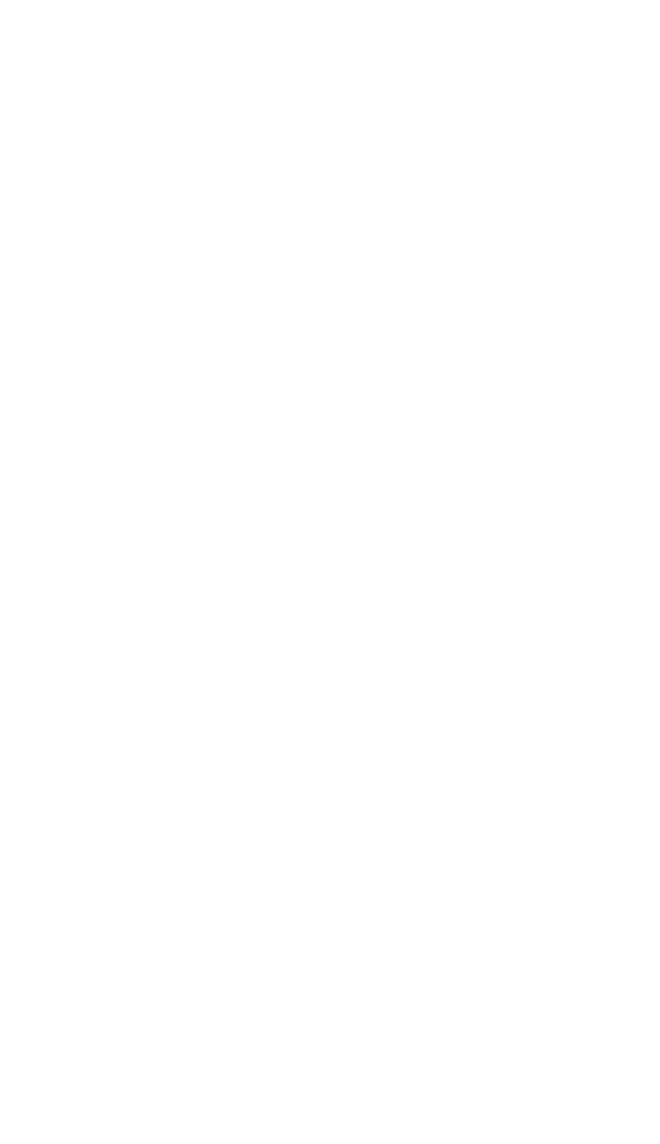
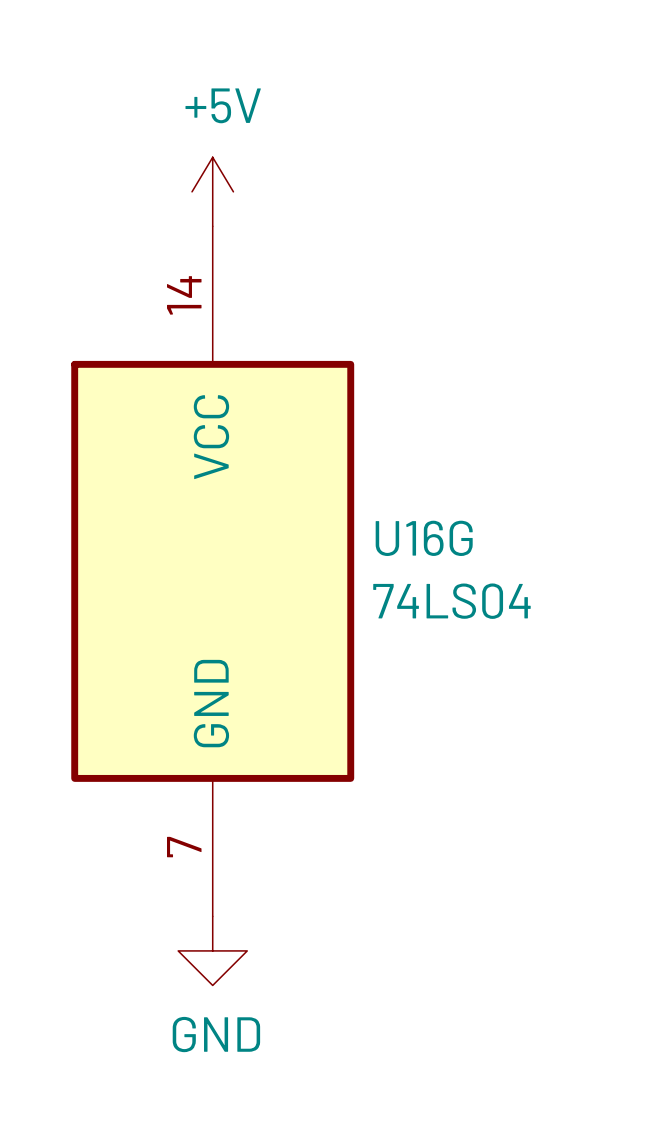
power symbol: none -> +5V (212, 191)
U16G: none -> 74LS04 (212, 571)
power symbol: none -> GND (212, 950)

